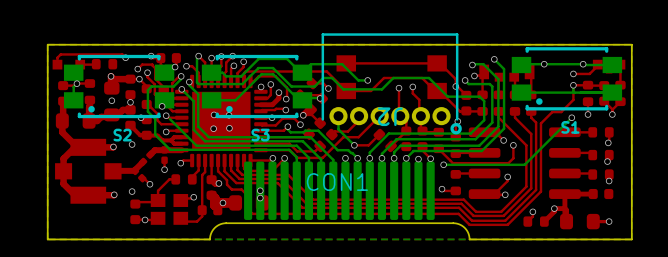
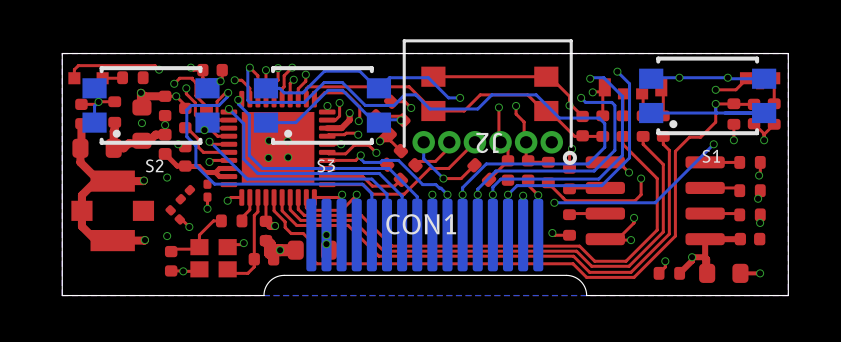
top track: (181, 150) (154, 150) (150, 154) -> none
top track: (143, 161) (134, 170) (113, 171) -> none

